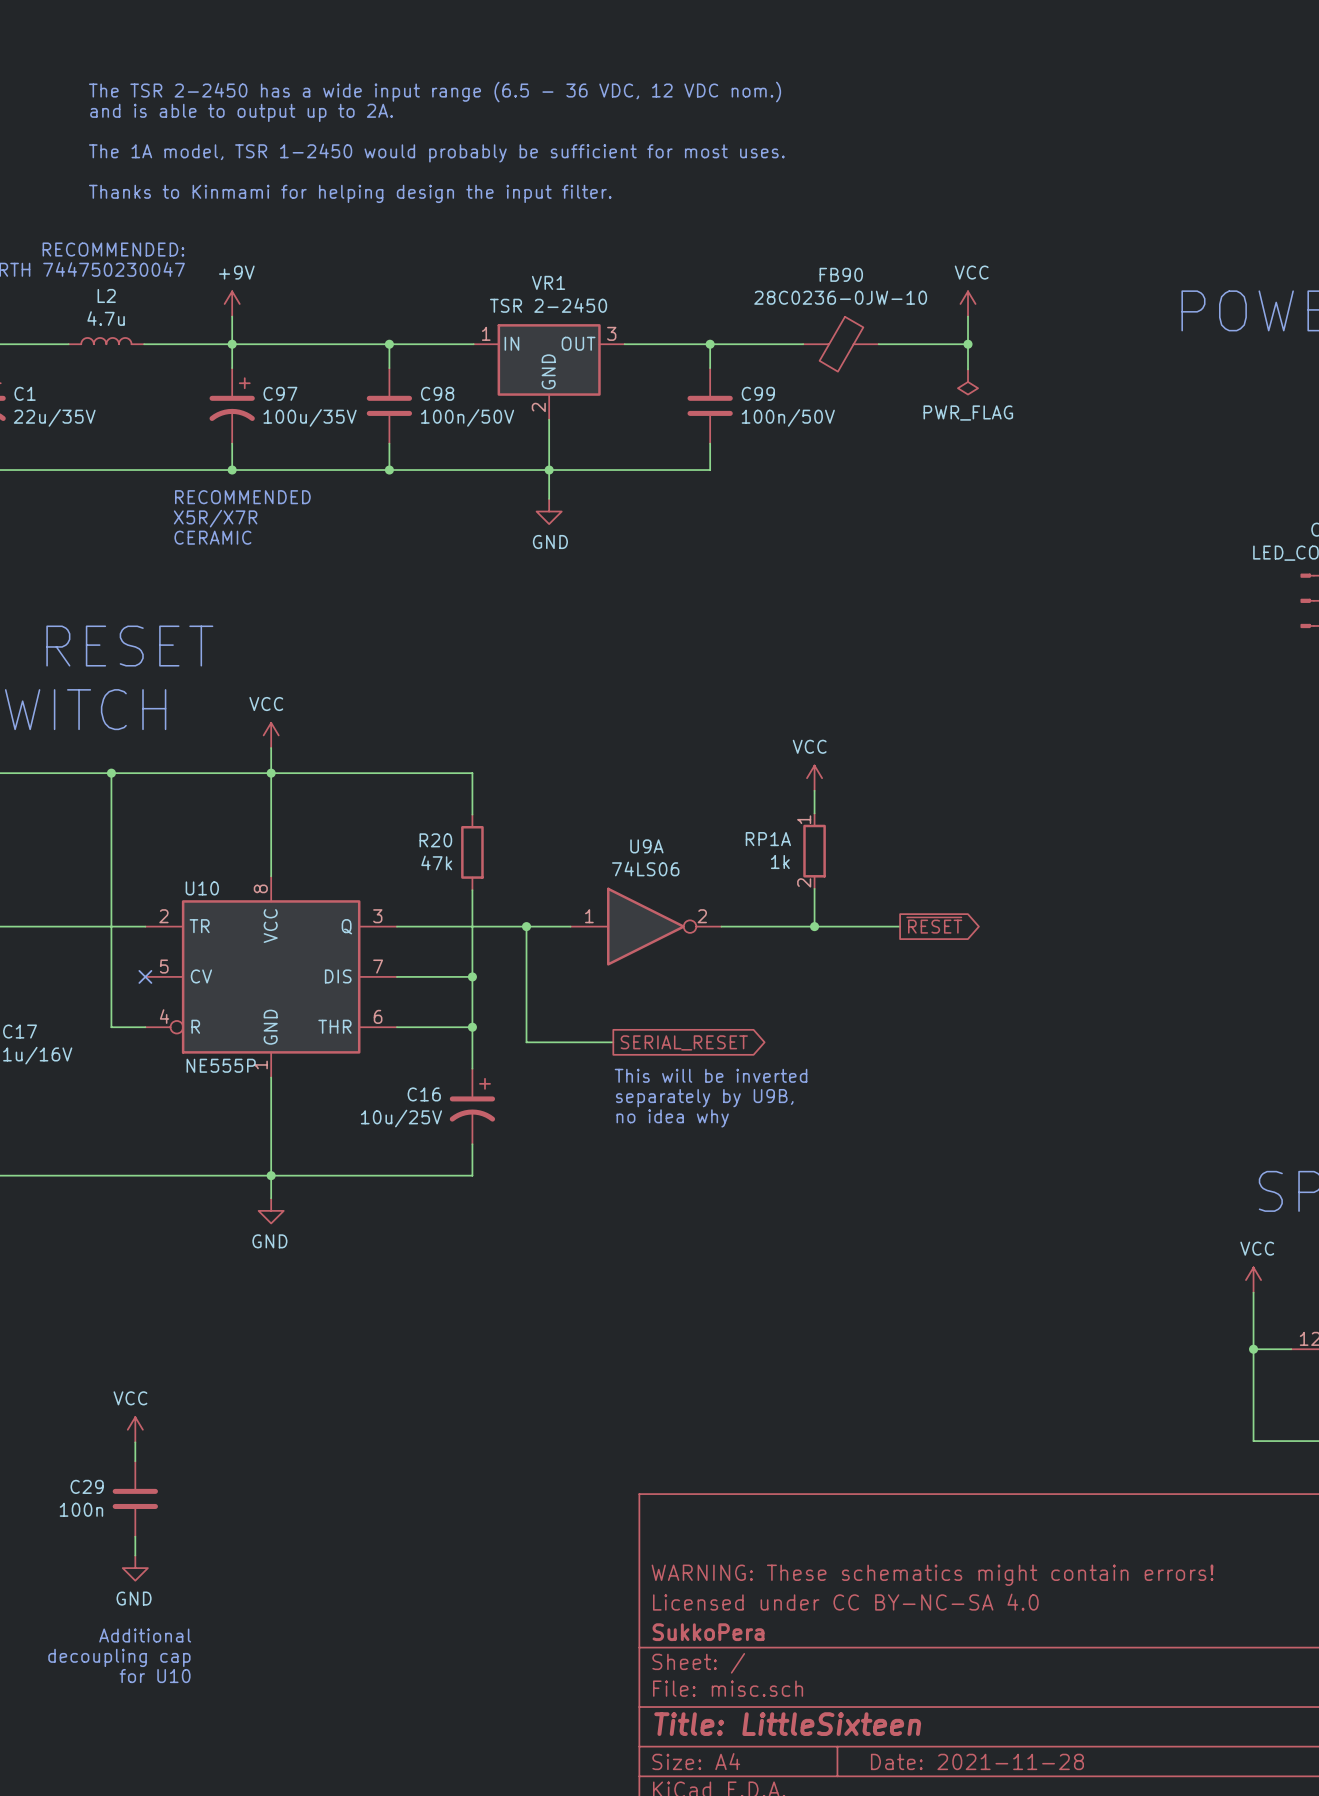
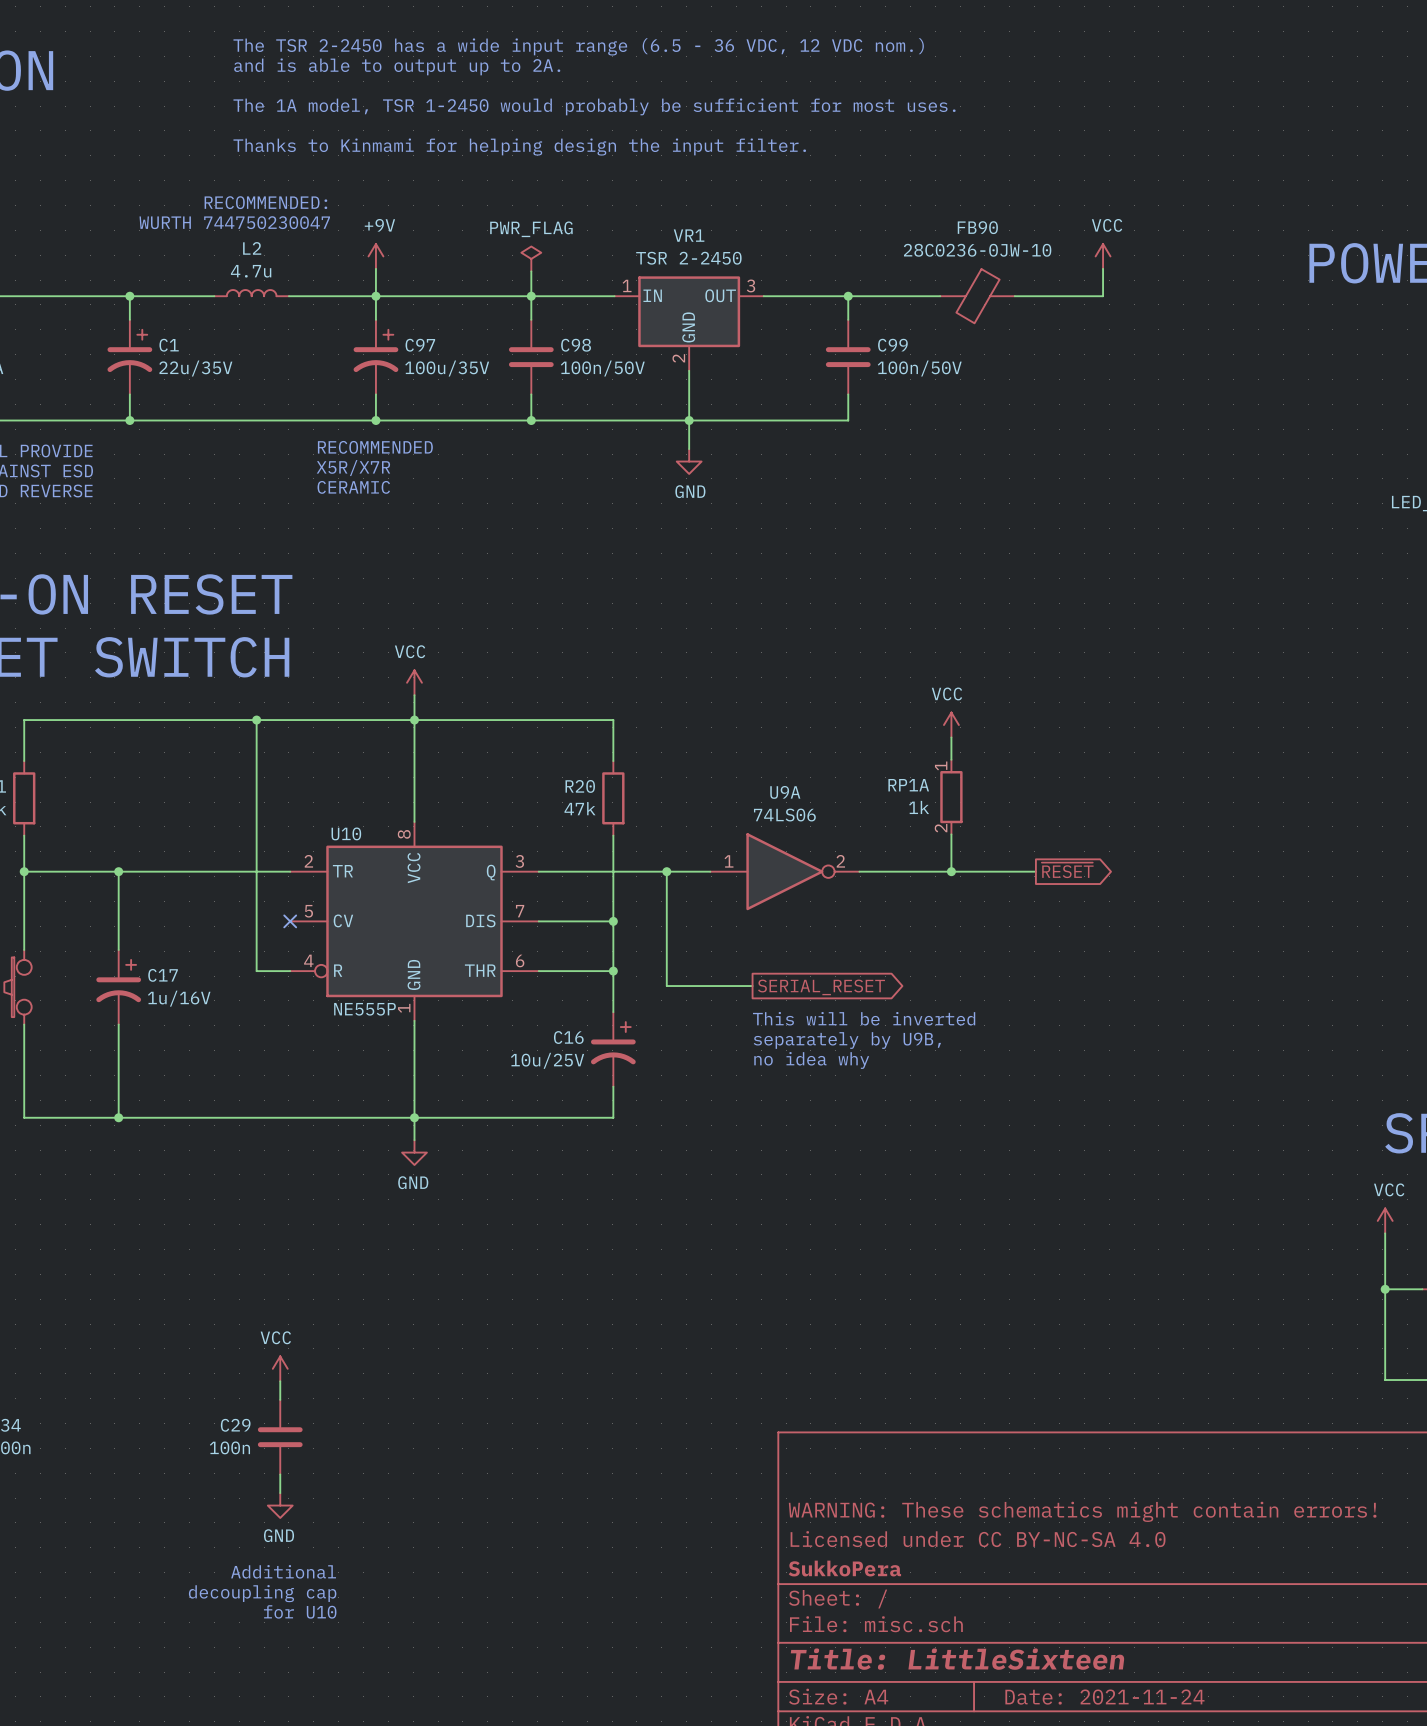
power symbol: none -> PWR_FLAG (531, 258)
wire: none -> (531, 271) (531, 296)
wire: (968, 344) (968, 369) -> none
junction: (968, 344) -> none
power symbol: PWR_FLAG (968, 381) -> none
title block: Date: 2021-11-28 (977, 1761) -> Date: 2021-11-24 (1104, 1697)

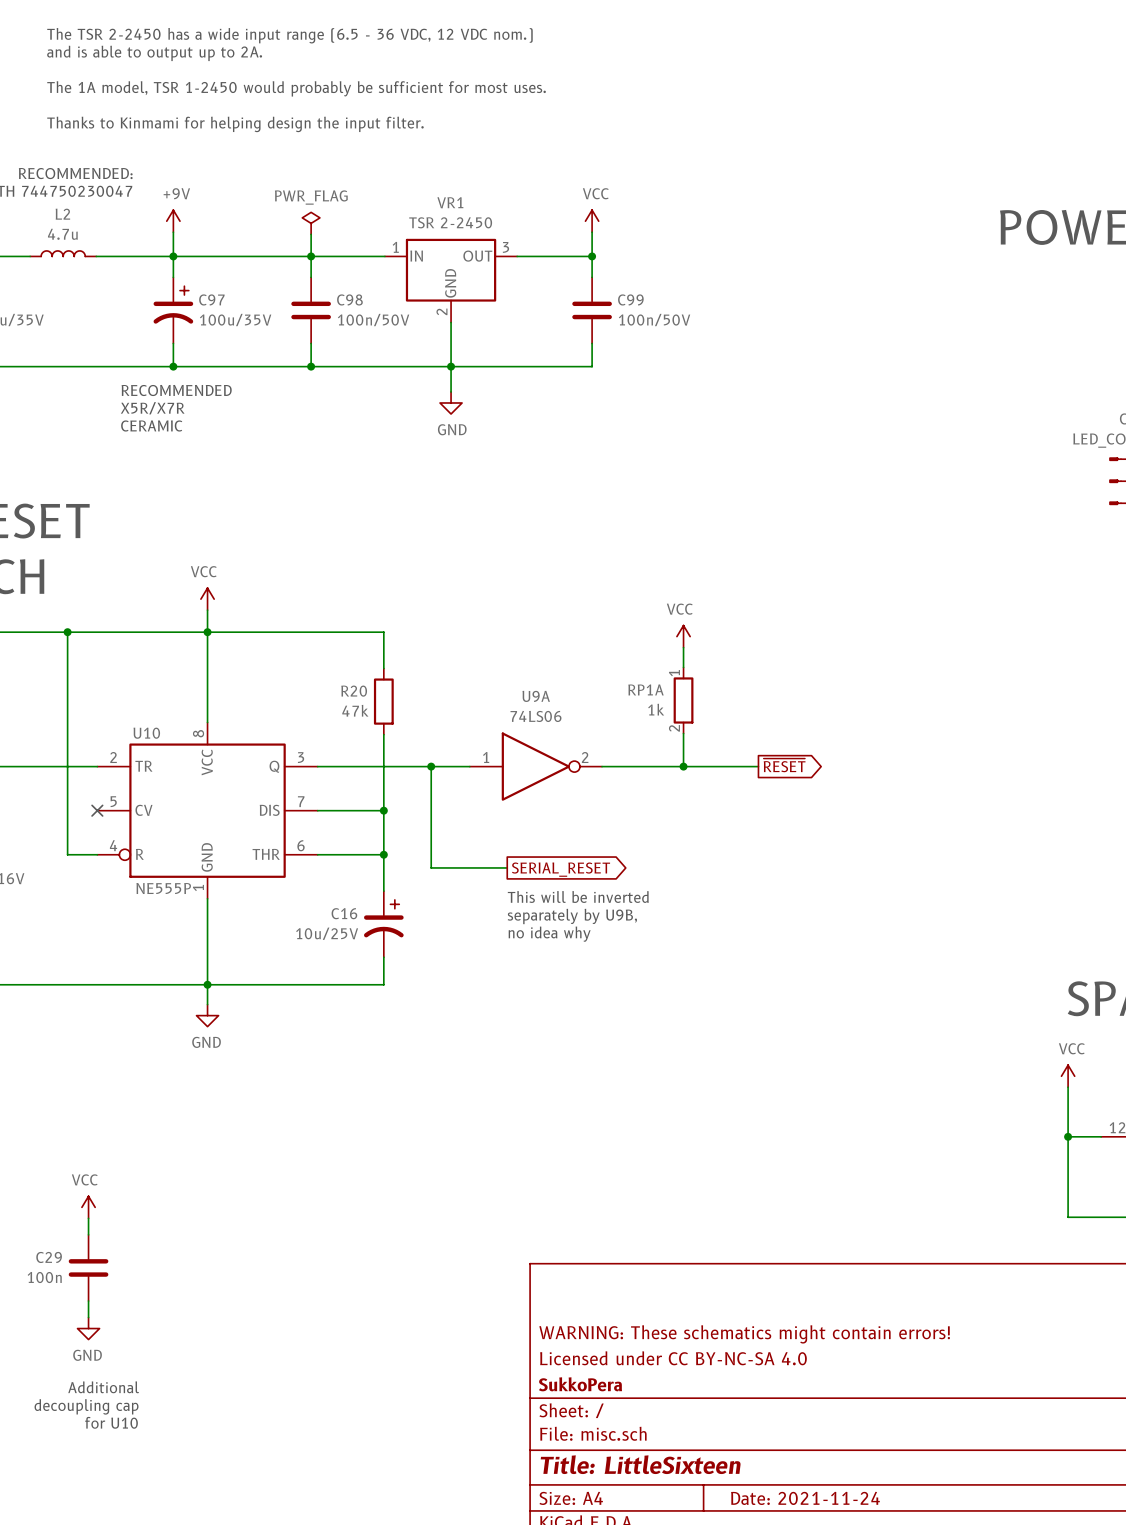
power symbol: none -> VCC (592, 221)
power symbol: VCC (1103, 256) -> none
wire: (1103, 268) (1103, 296) (1014, 296) -> none
wire: (848, 296) (940, 296) -> (592, 256) (592, 232)
FB90: 28C0236-0JW-10 (977, 296) -> none

